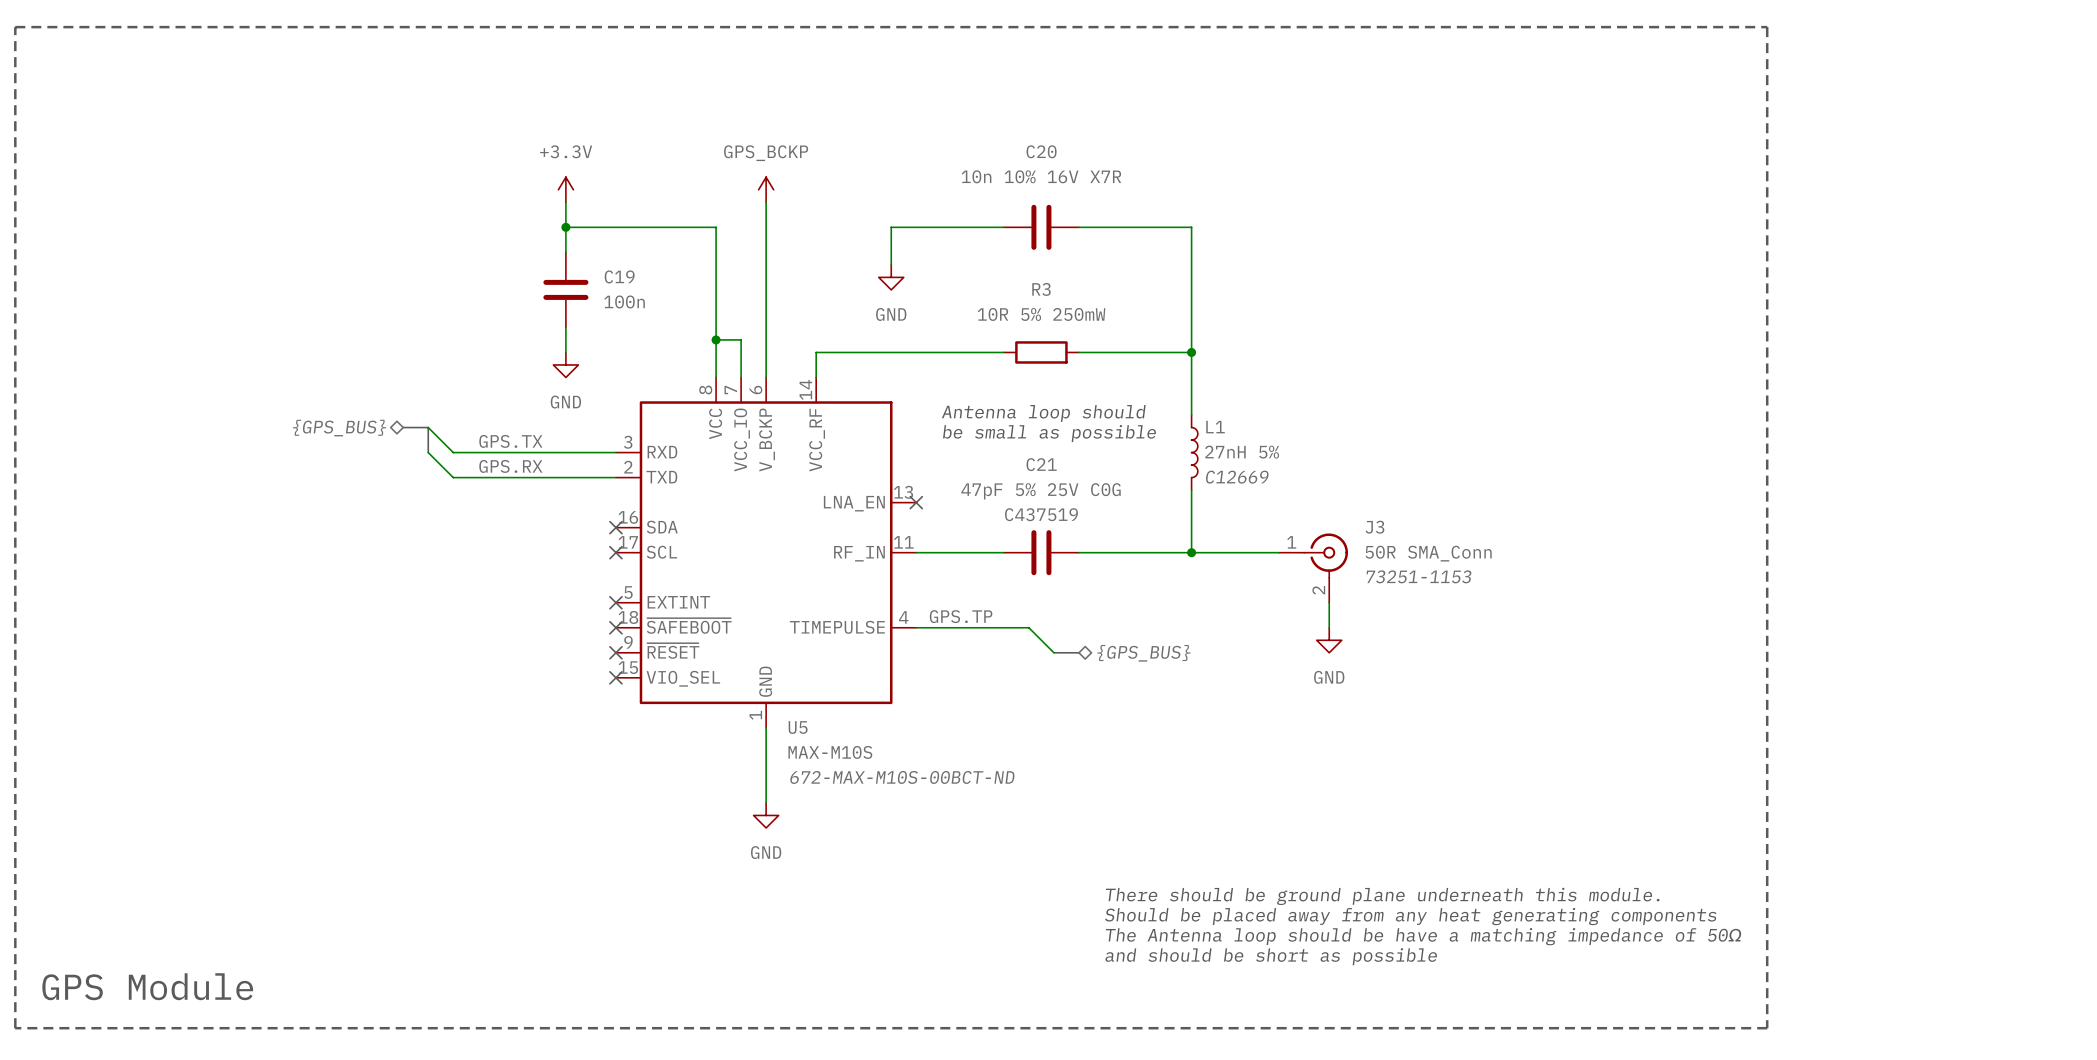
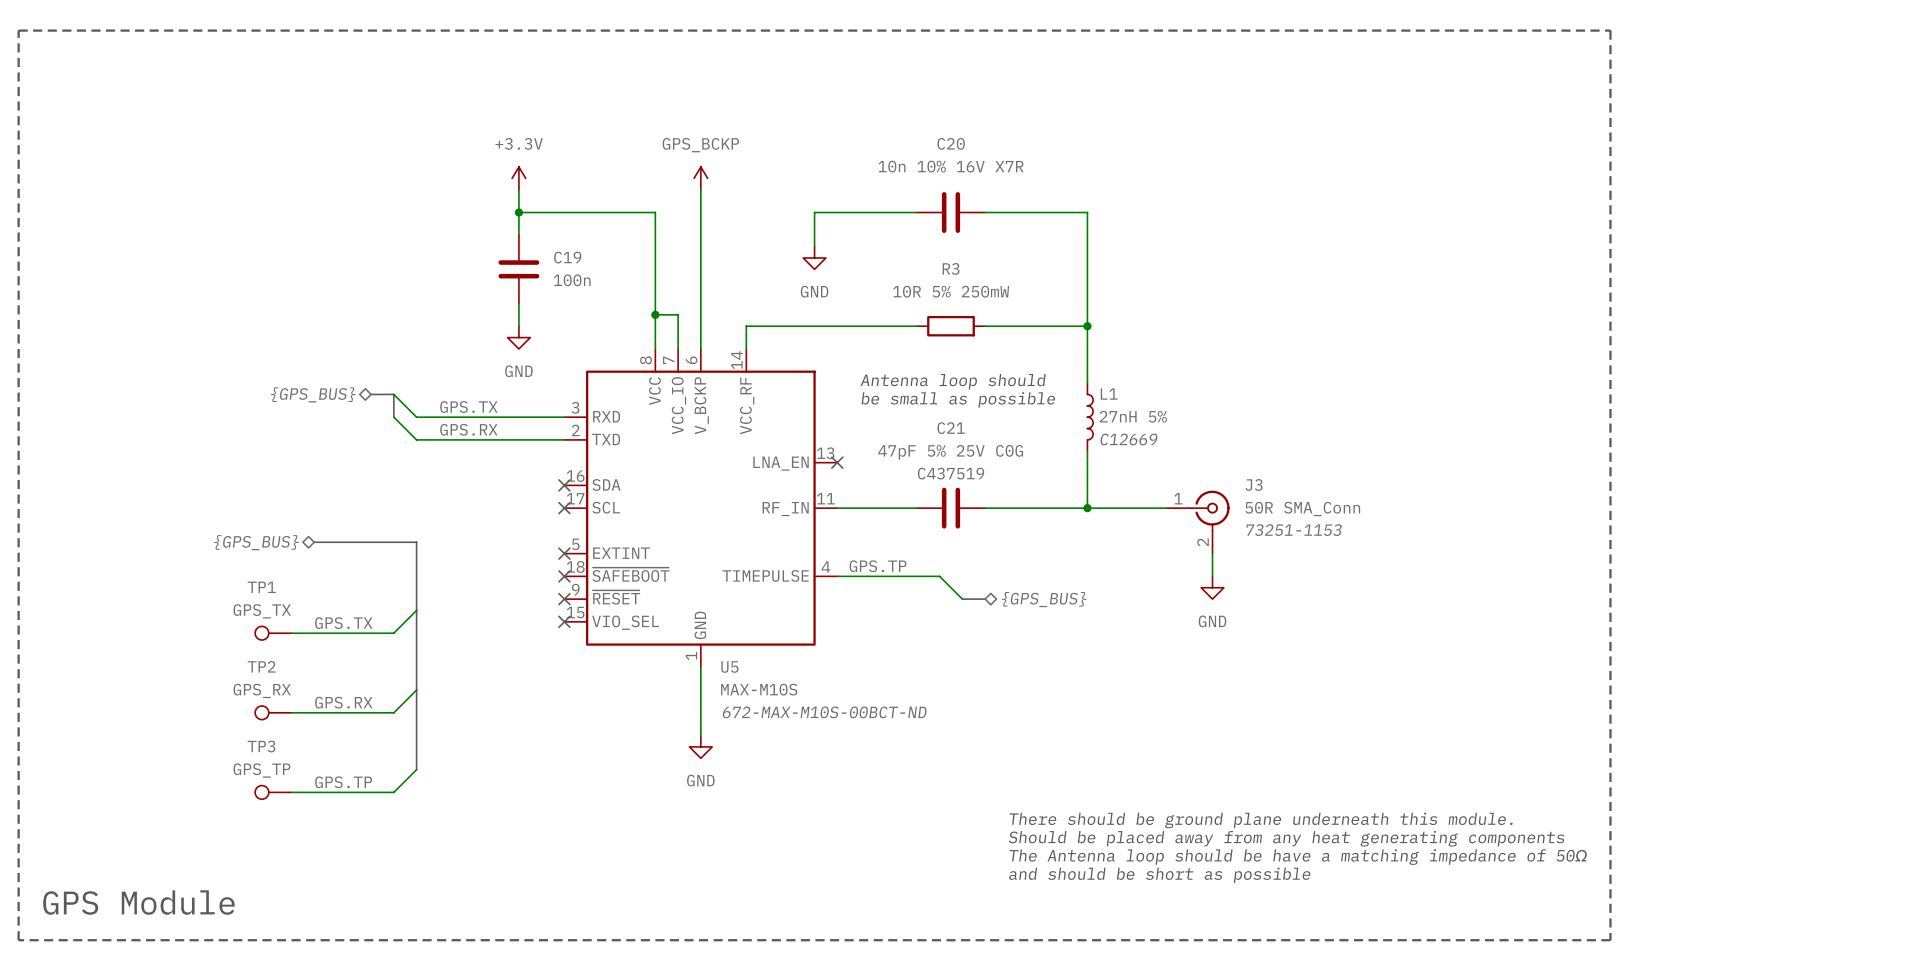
hierarchical label: none -> {GPS_BUS} (256, 542)
bus: none -> (314, 542) (416, 542) (416, 769)
wire: none -> (416, 610) (393, 633) (291, 633)
label: none -> GPS.TX (343, 623)
TP1: none -> GPS_TX (273, 633)
wire: none -> (416, 690) (393, 712) (291, 712)
label: none -> GPS.RX (343, 702)
TP2: none -> GPS_RX (273, 712)
wire: none -> (416, 769) (393, 792) (291, 792)
label: none -> GPS.TP (343, 782)
TP3: none -> GPS_TP (273, 792)

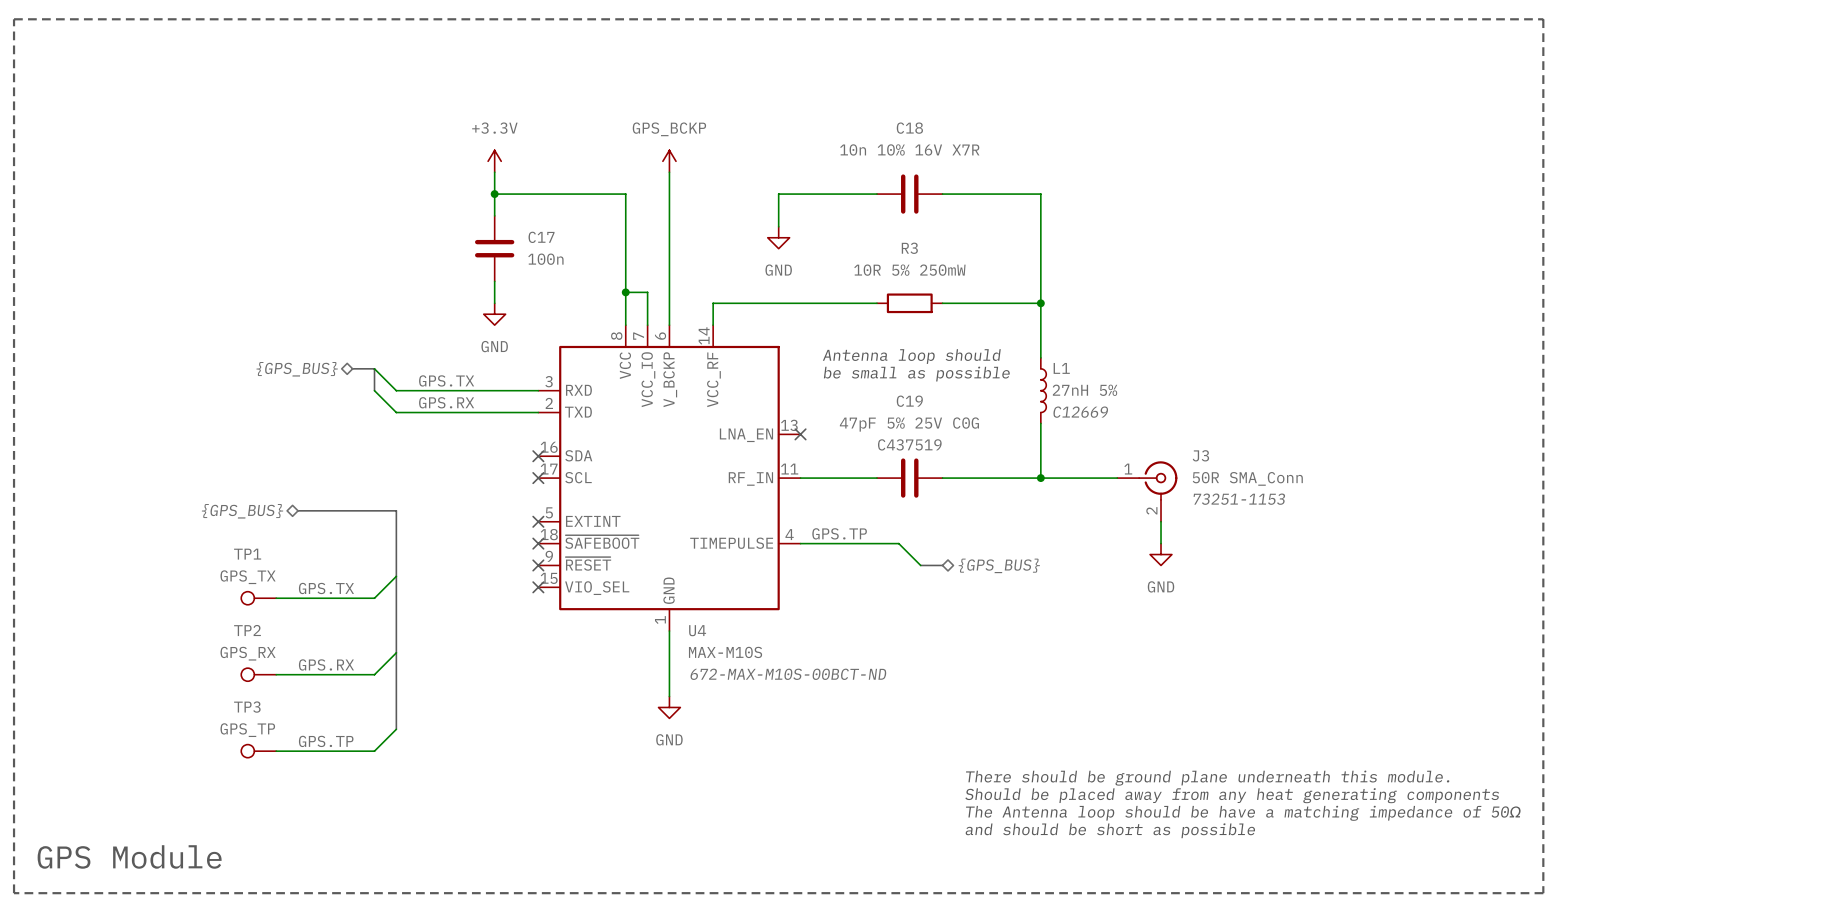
C20 name: C20 (951, 143) -> C18 (909, 128)
C19 name: C19 (567, 257) -> C17 (541, 237)
C21 name: C21 (951, 428) -> C19 (909, 401)
U5 name: U5 (729, 667) -> U4 (697, 630)

